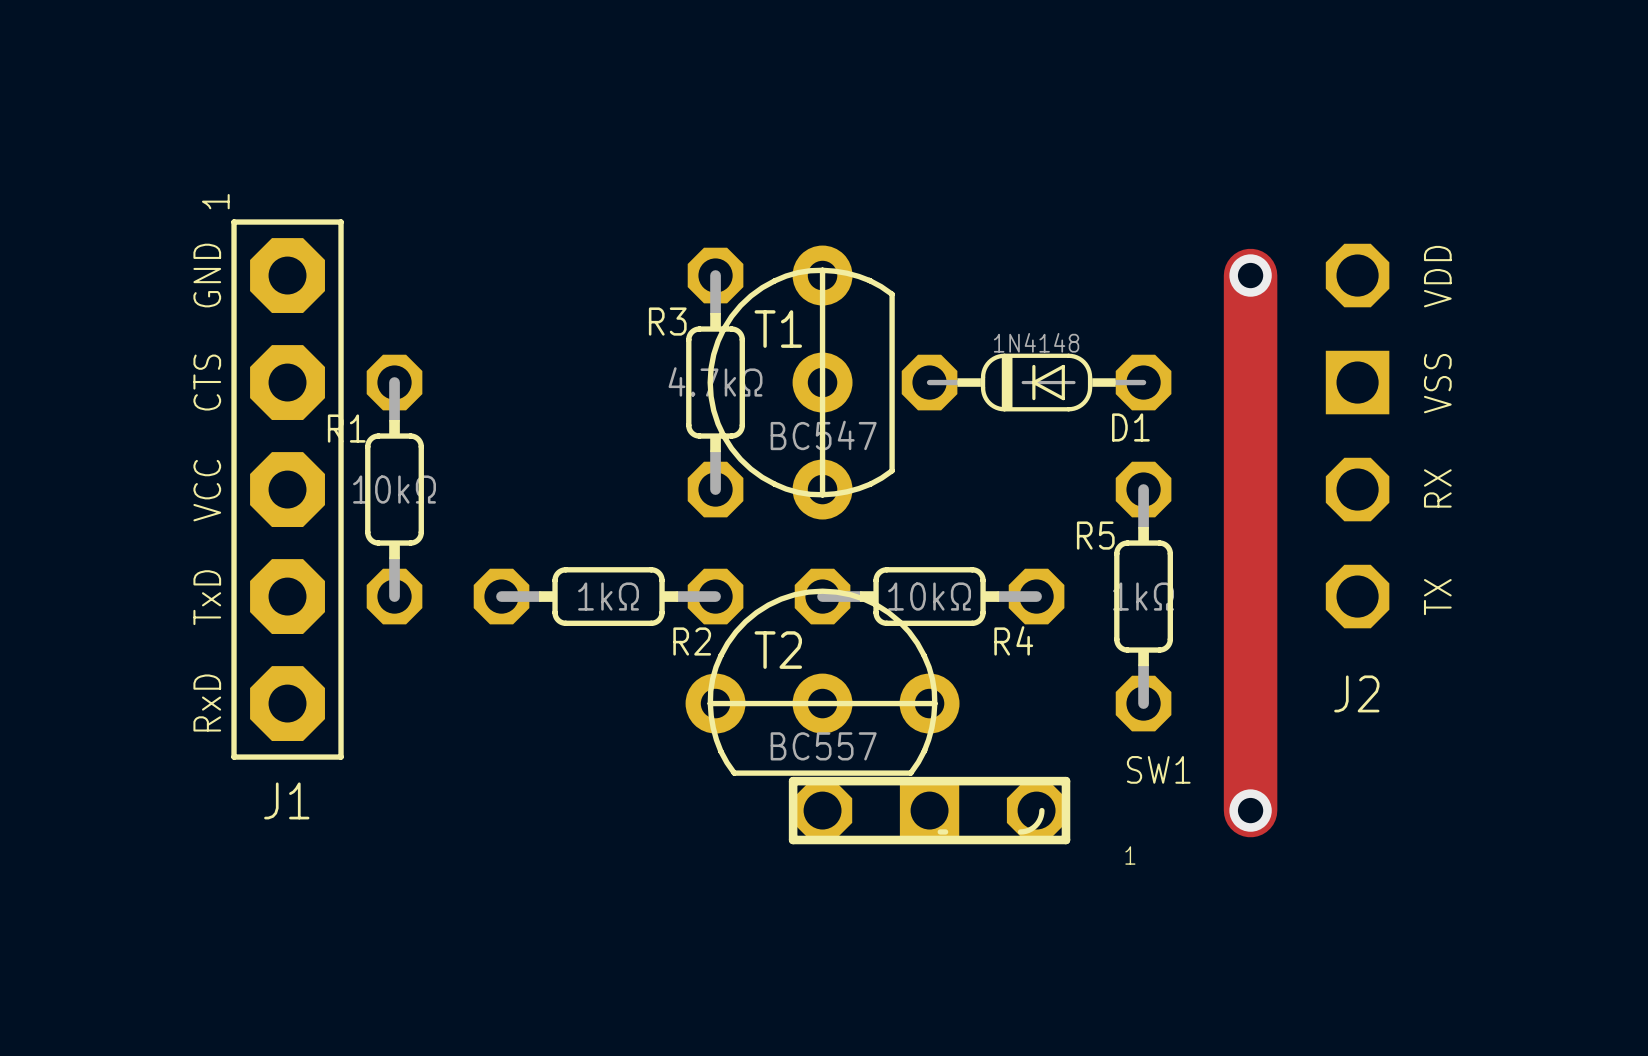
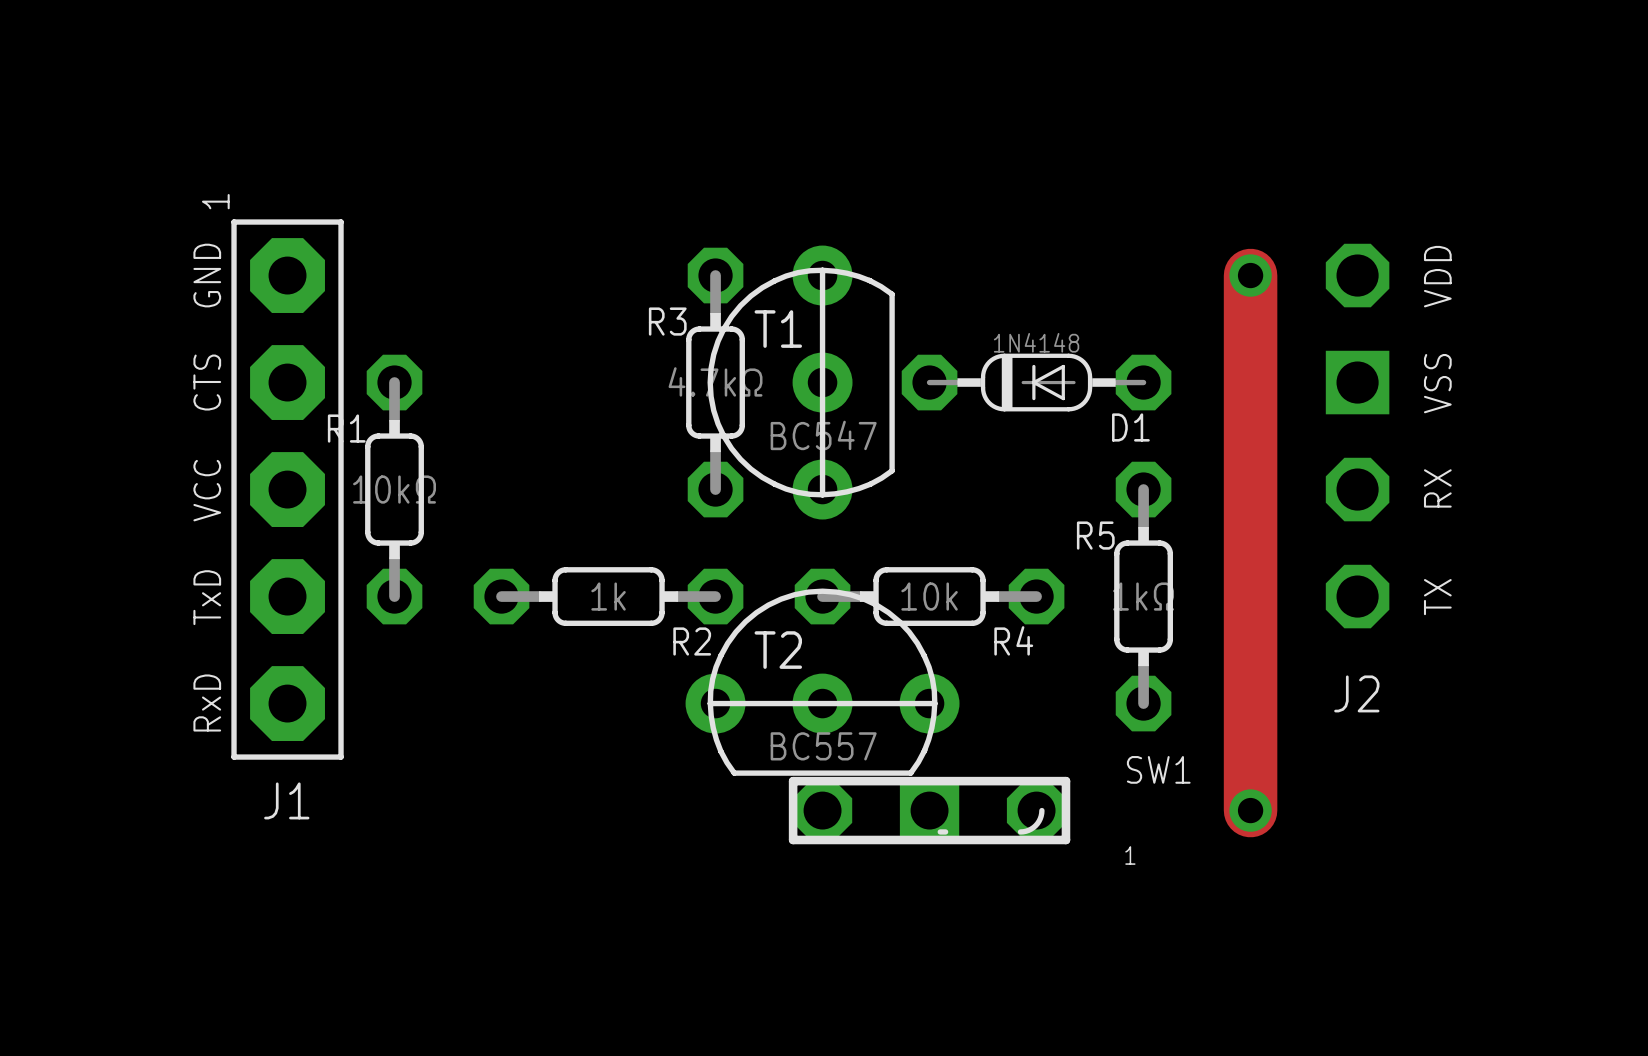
R2 value: 1kΩ (608, 596) -> 1k (608, 596)
R4 value: 10kΩ (929, 596) -> 10k (929, 596)

